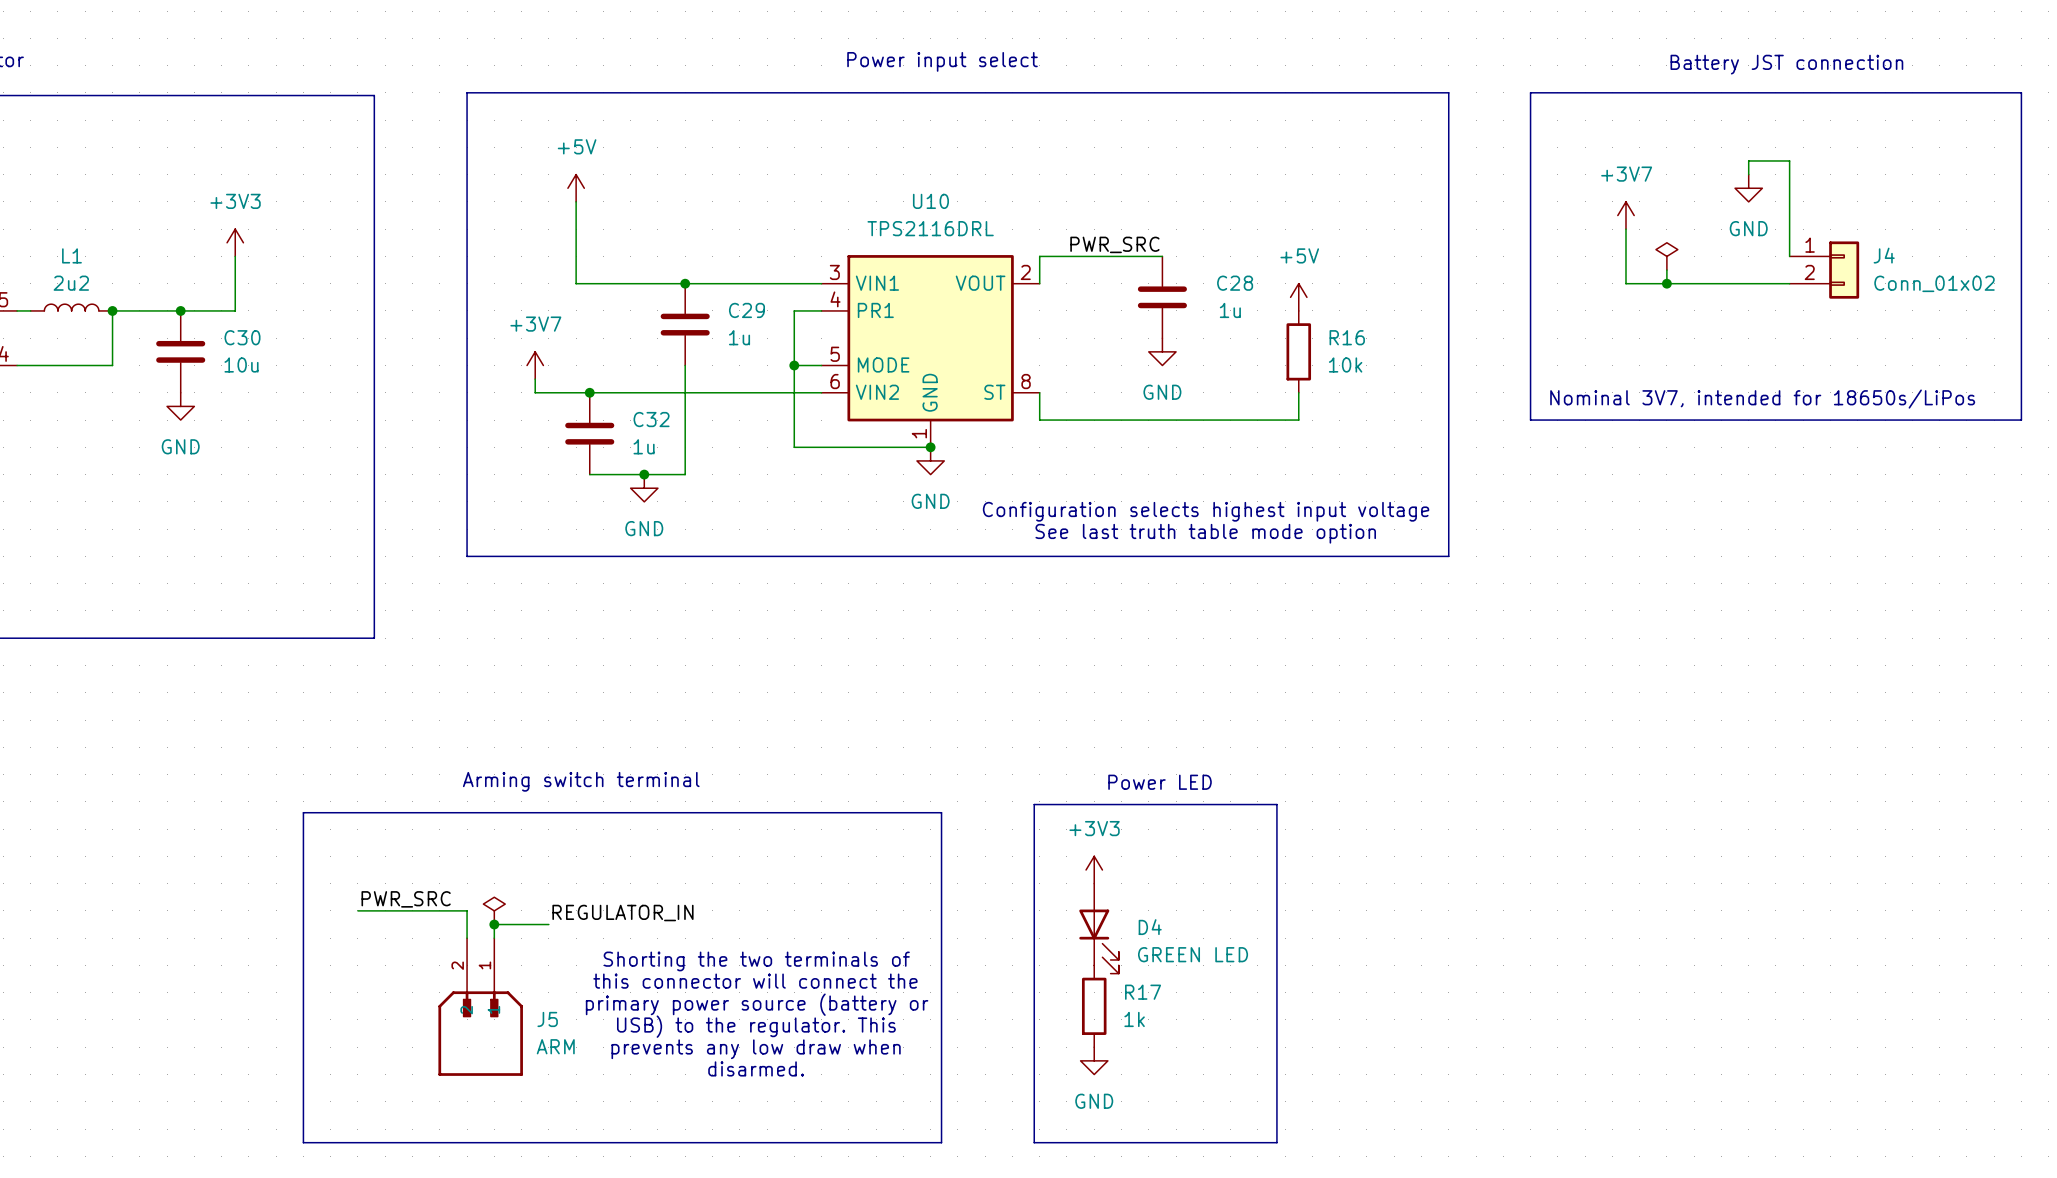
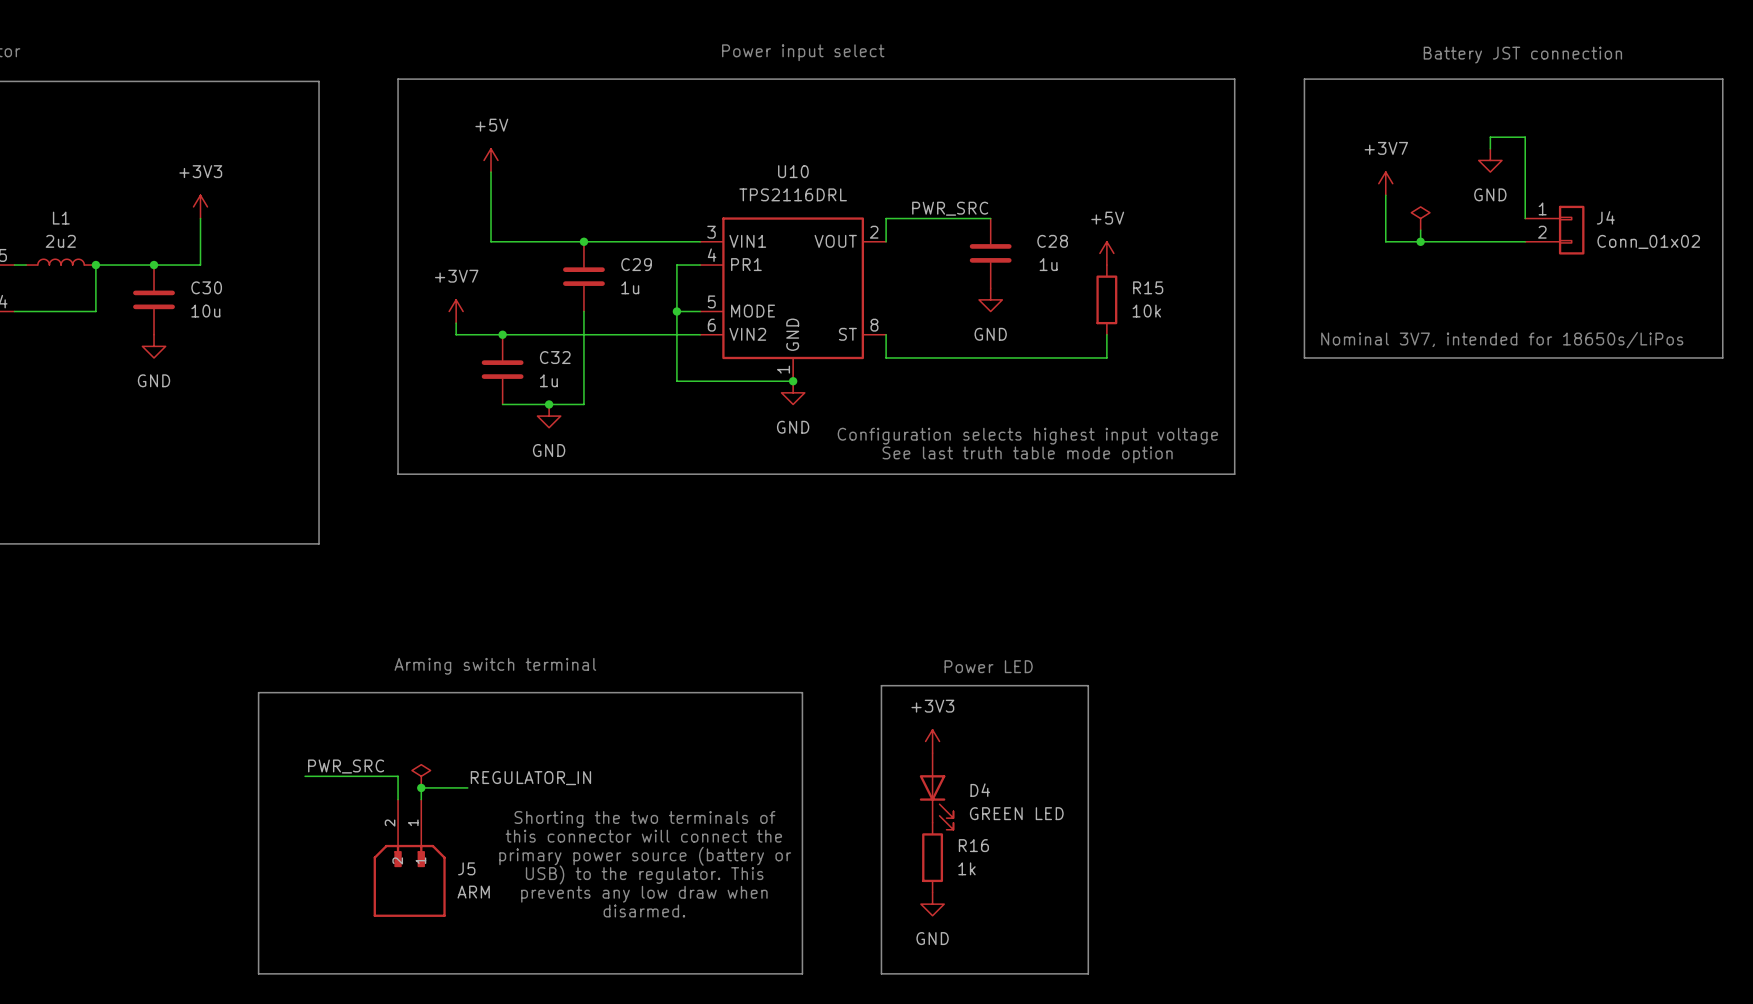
R16 name: R16 (1347, 337) -> R15 (1148, 287)
R17 name: R17 (1143, 992) -> R16 (973, 845)

